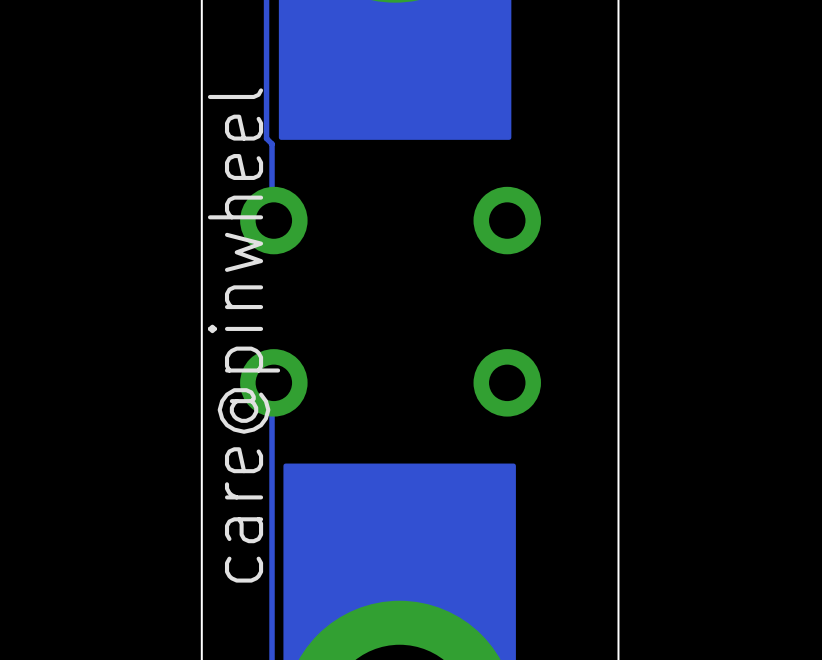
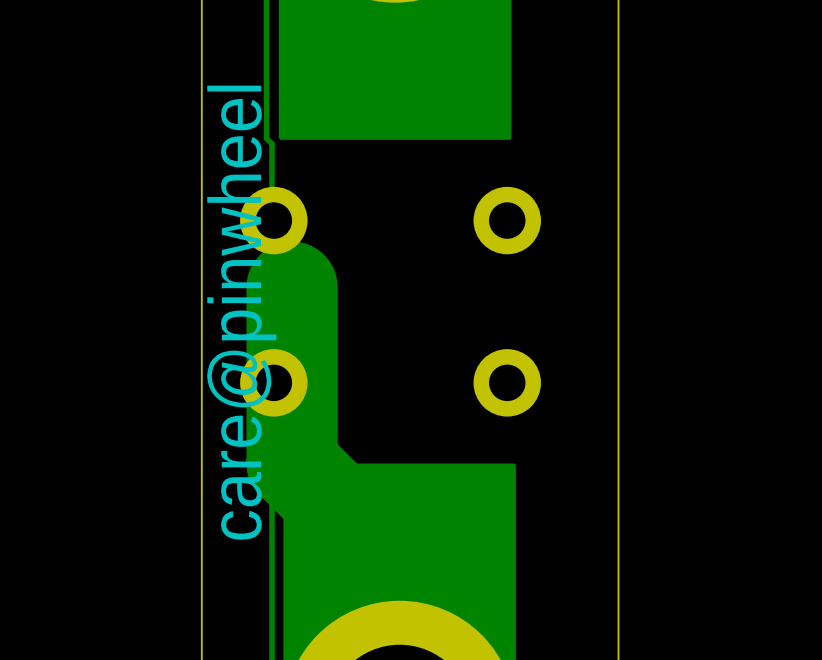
track: none -> (292, 287) (292, 463) (408, 579)

